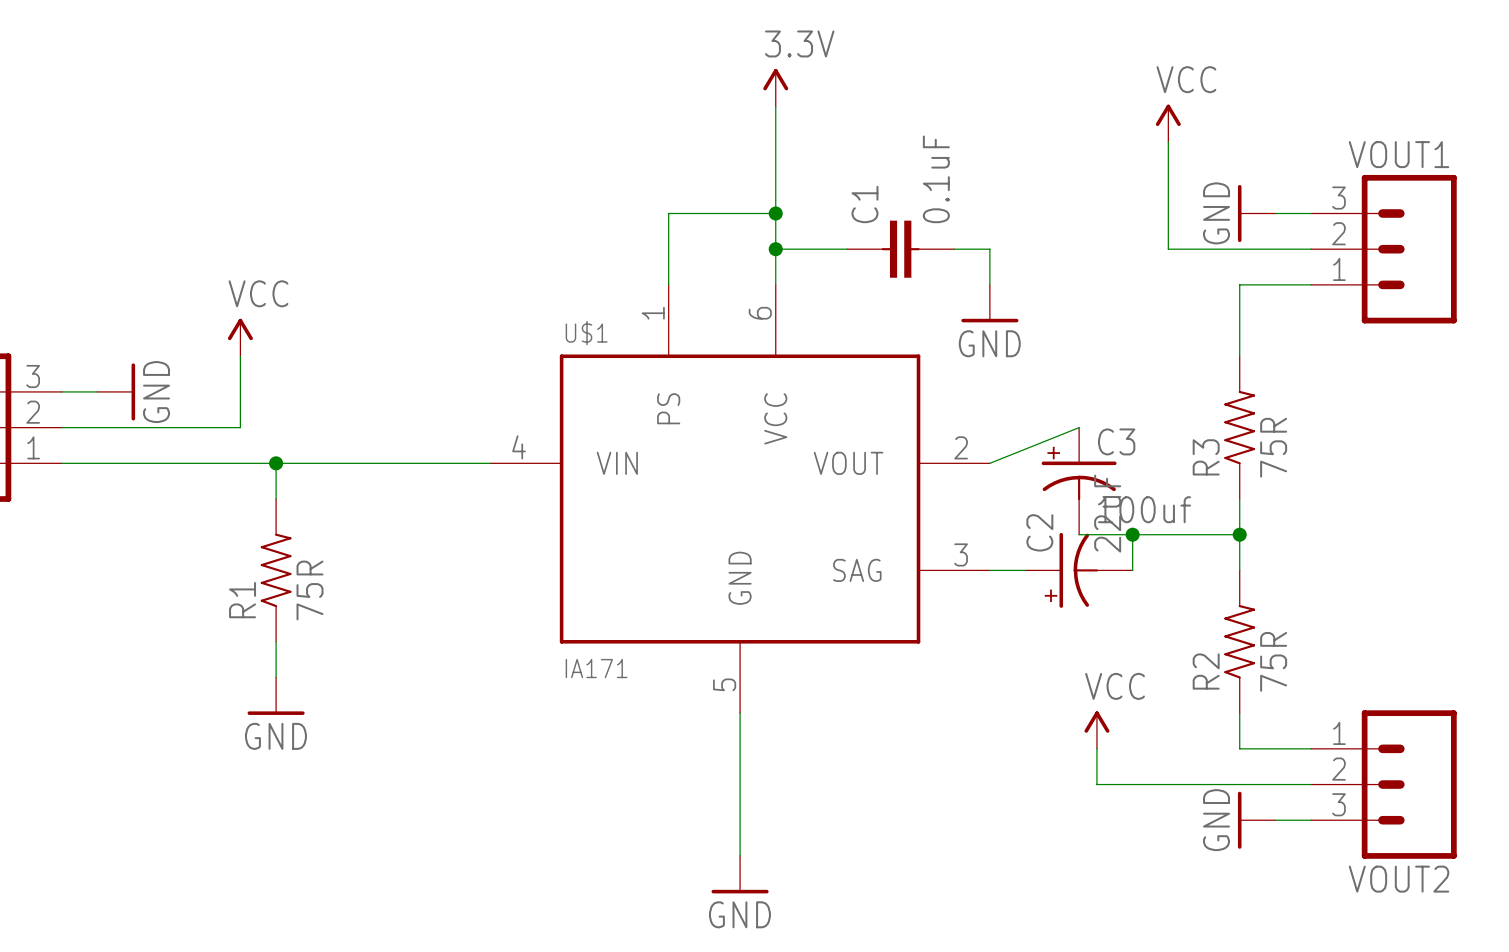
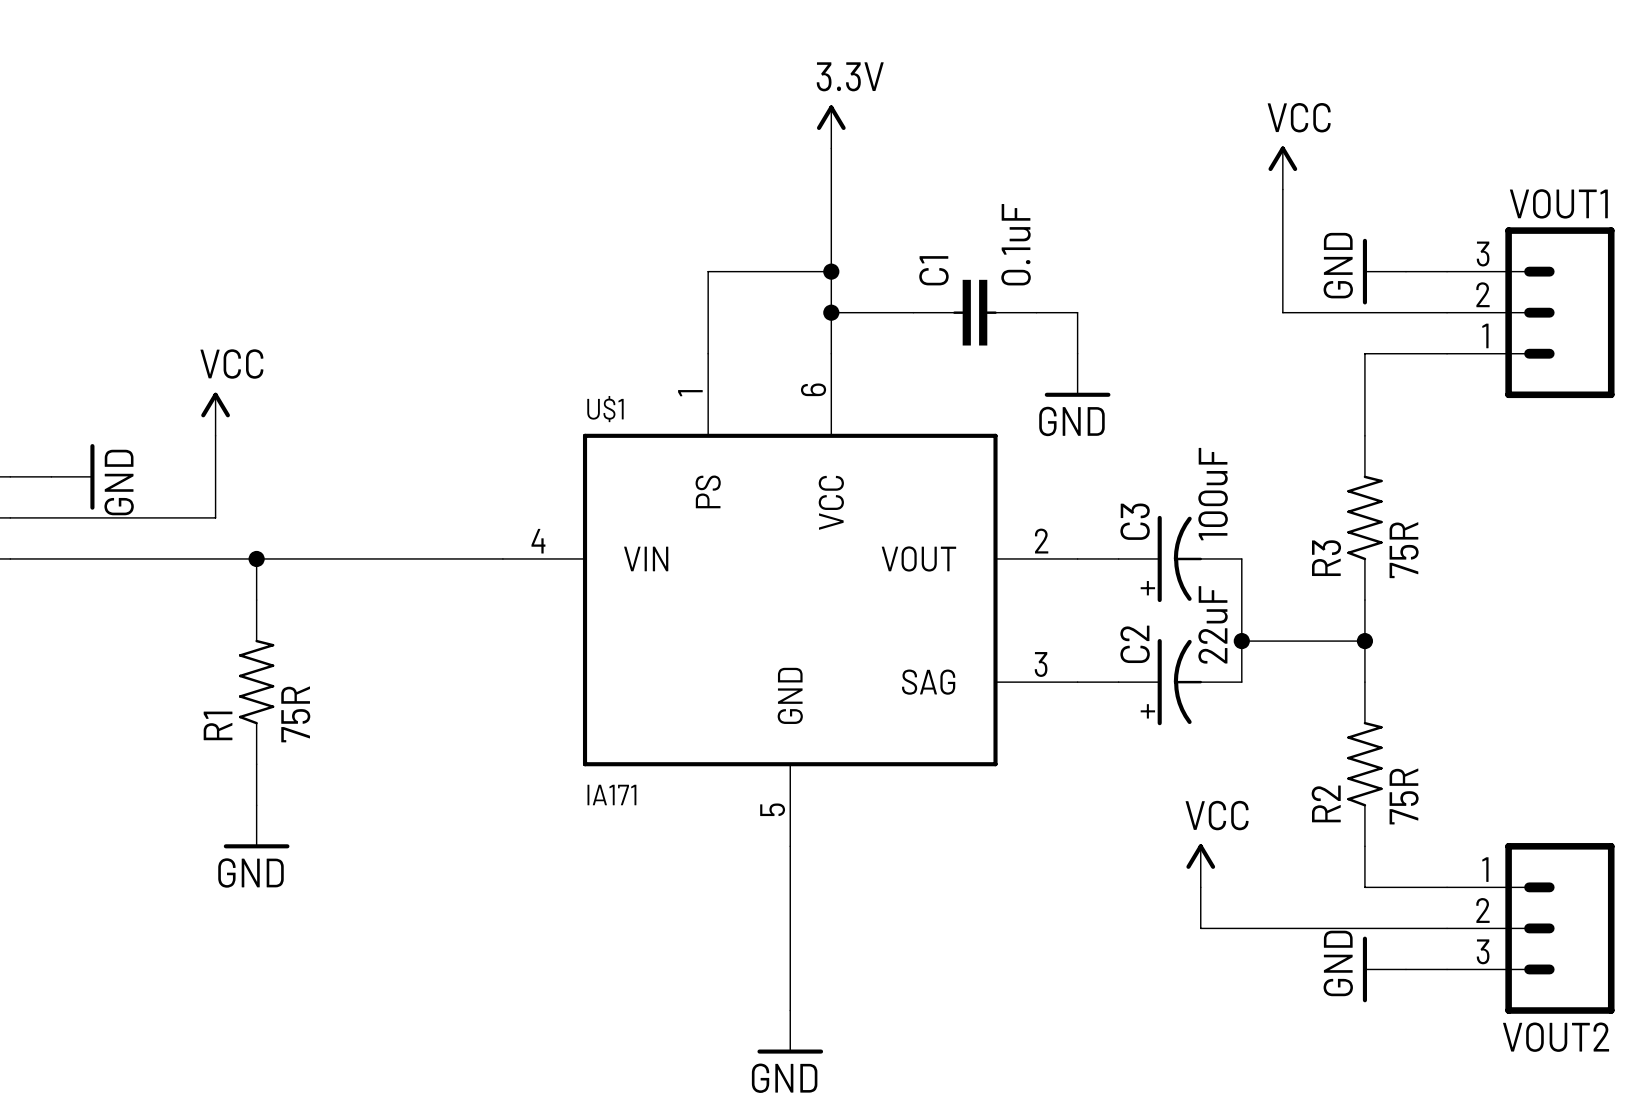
wire: (1079, 427) (989, 463) -> (1118, 558) (1077, 558)
C3 rotation: 0° (1079, 473) -> 90° counterclockwise (1171, 558)
C3 value: 100uf (1144, 509) -> 100uF (1213, 494)
wire: (1079, 534) (1132, 534) -> (1241, 558) (1241, 641)

